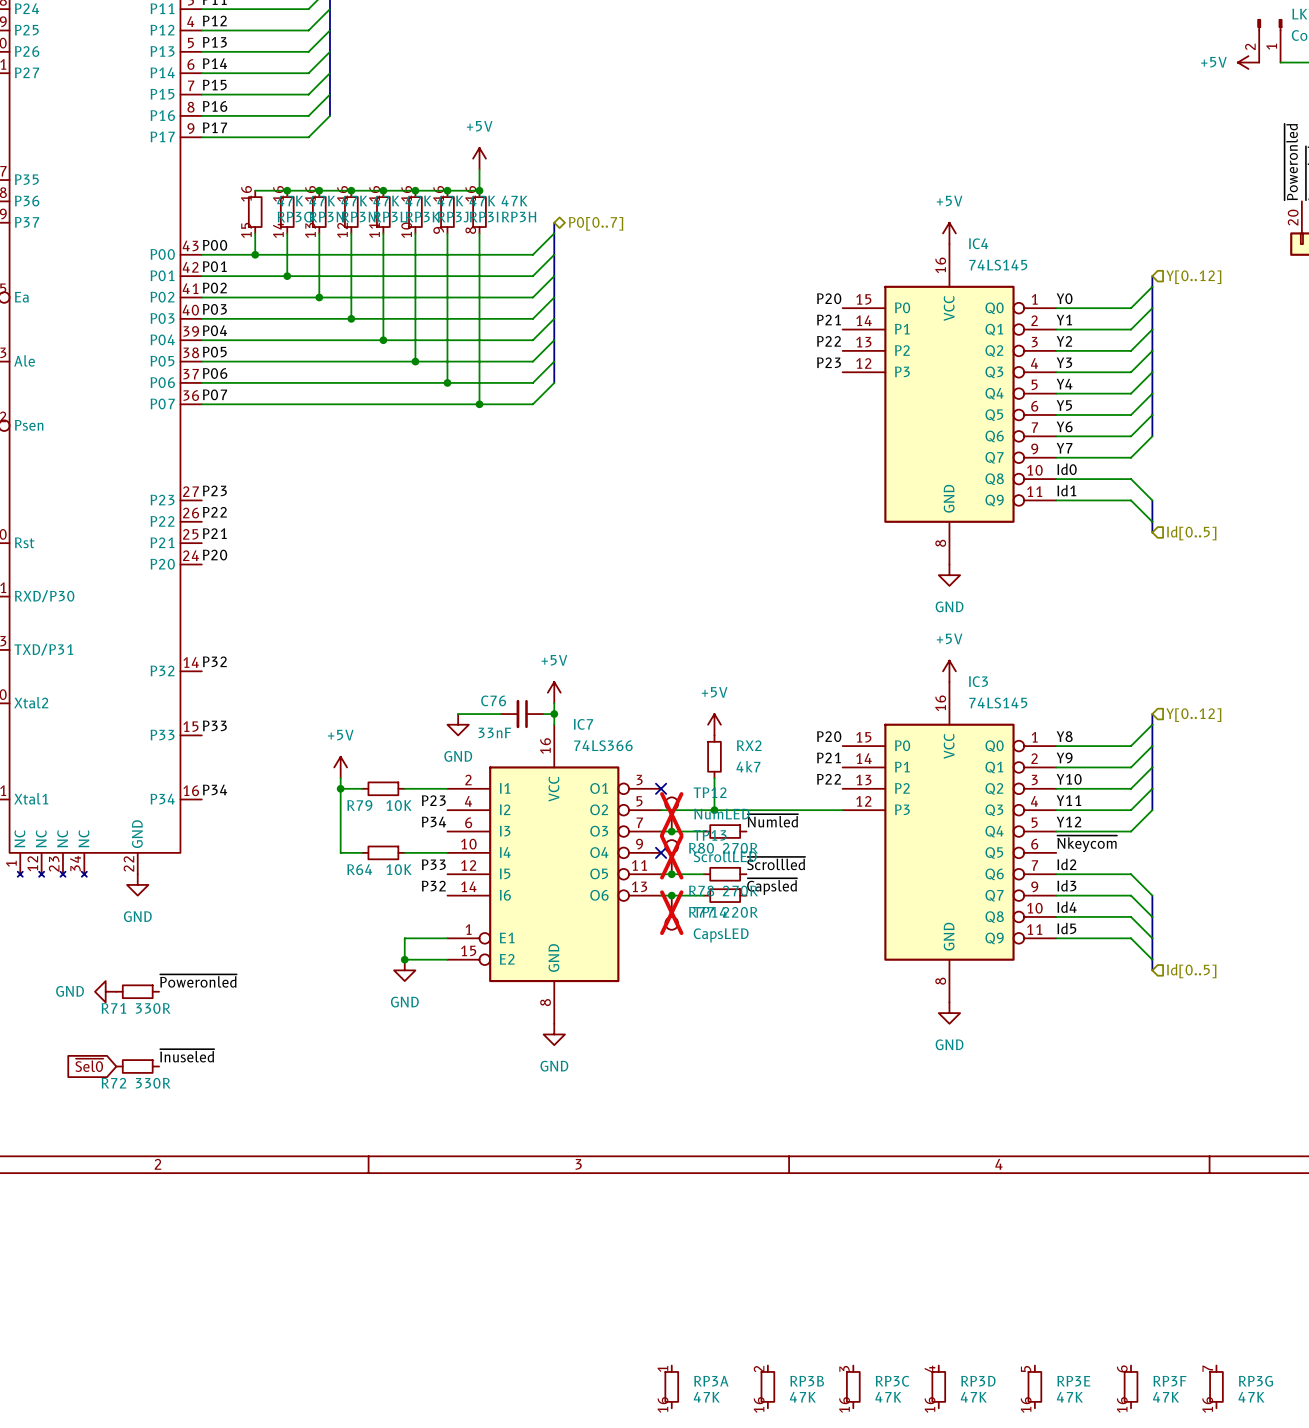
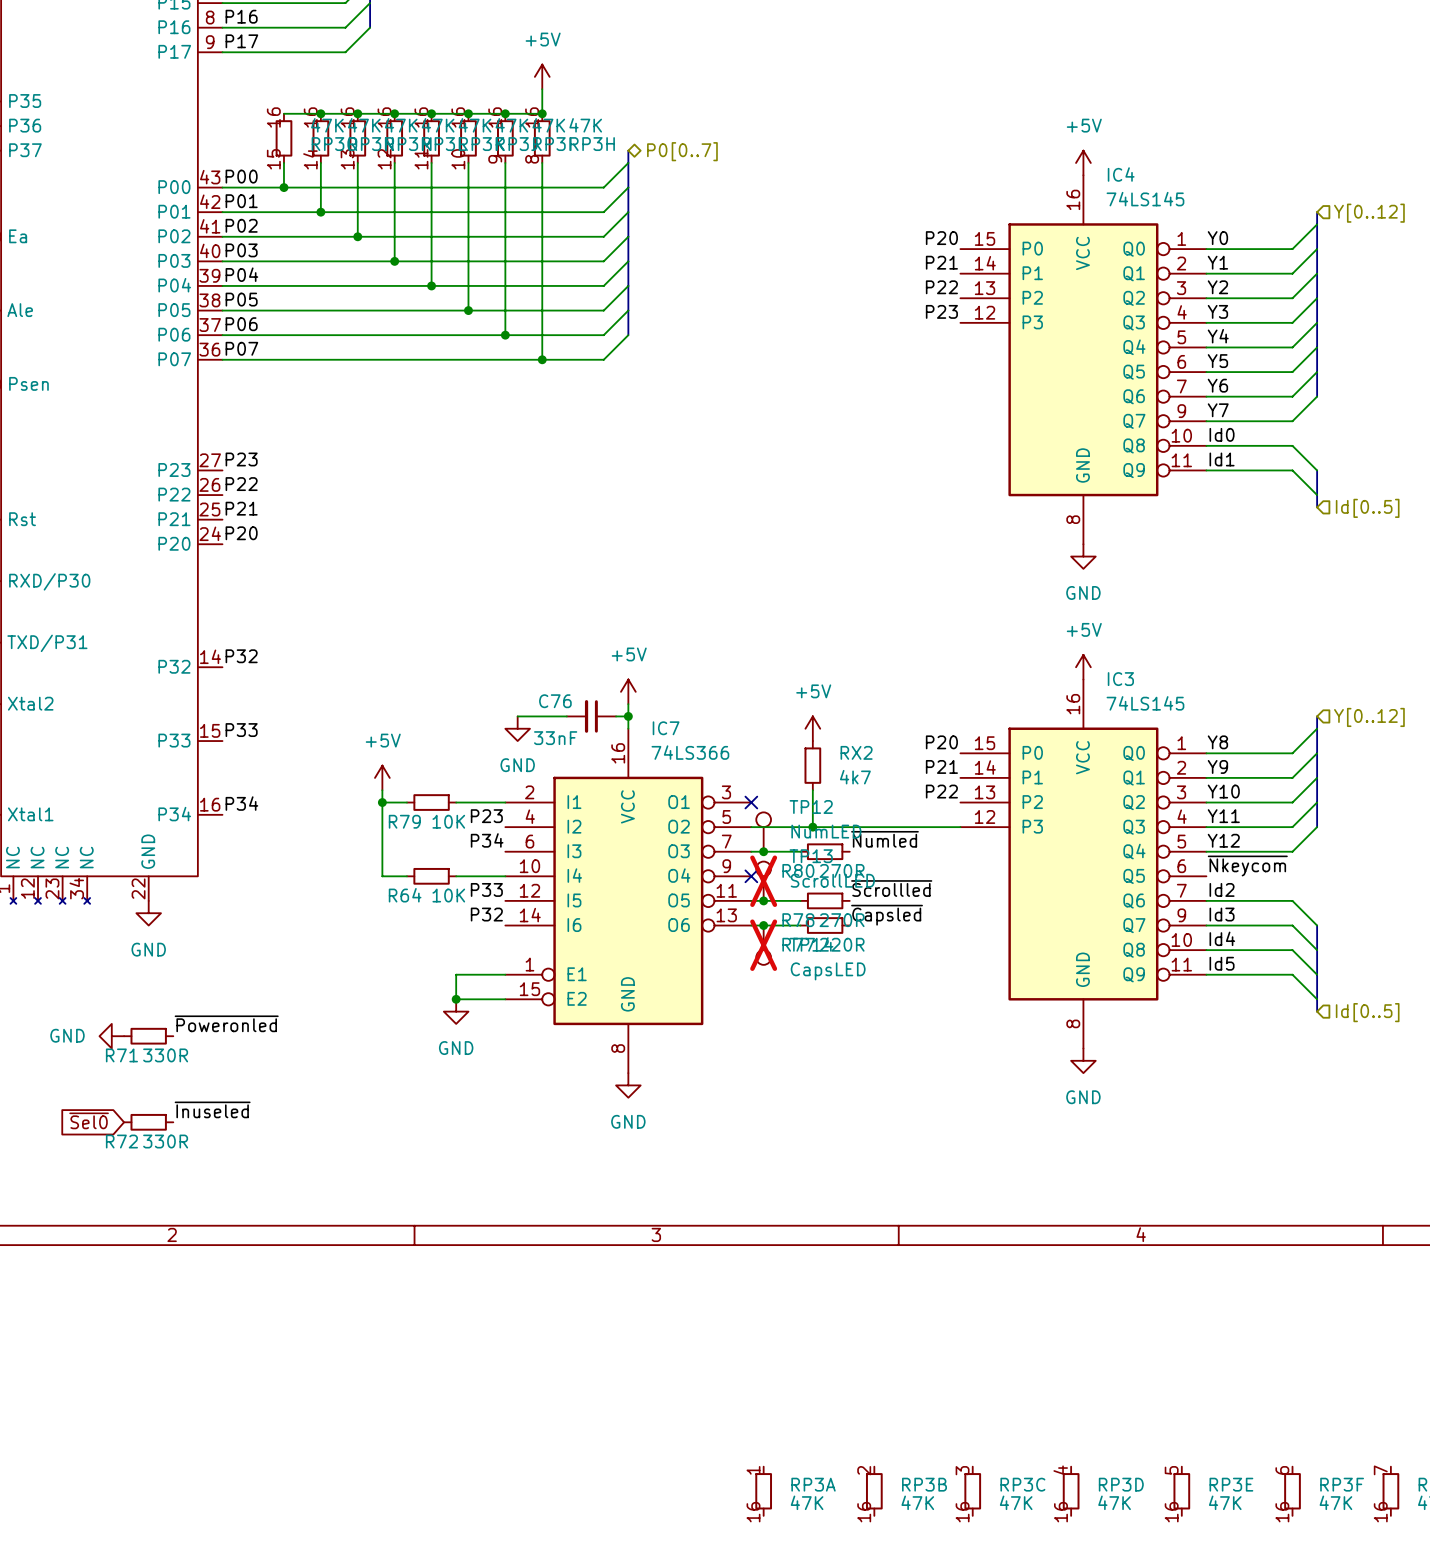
TP12 do-not-place cross: (671, 814) -> none

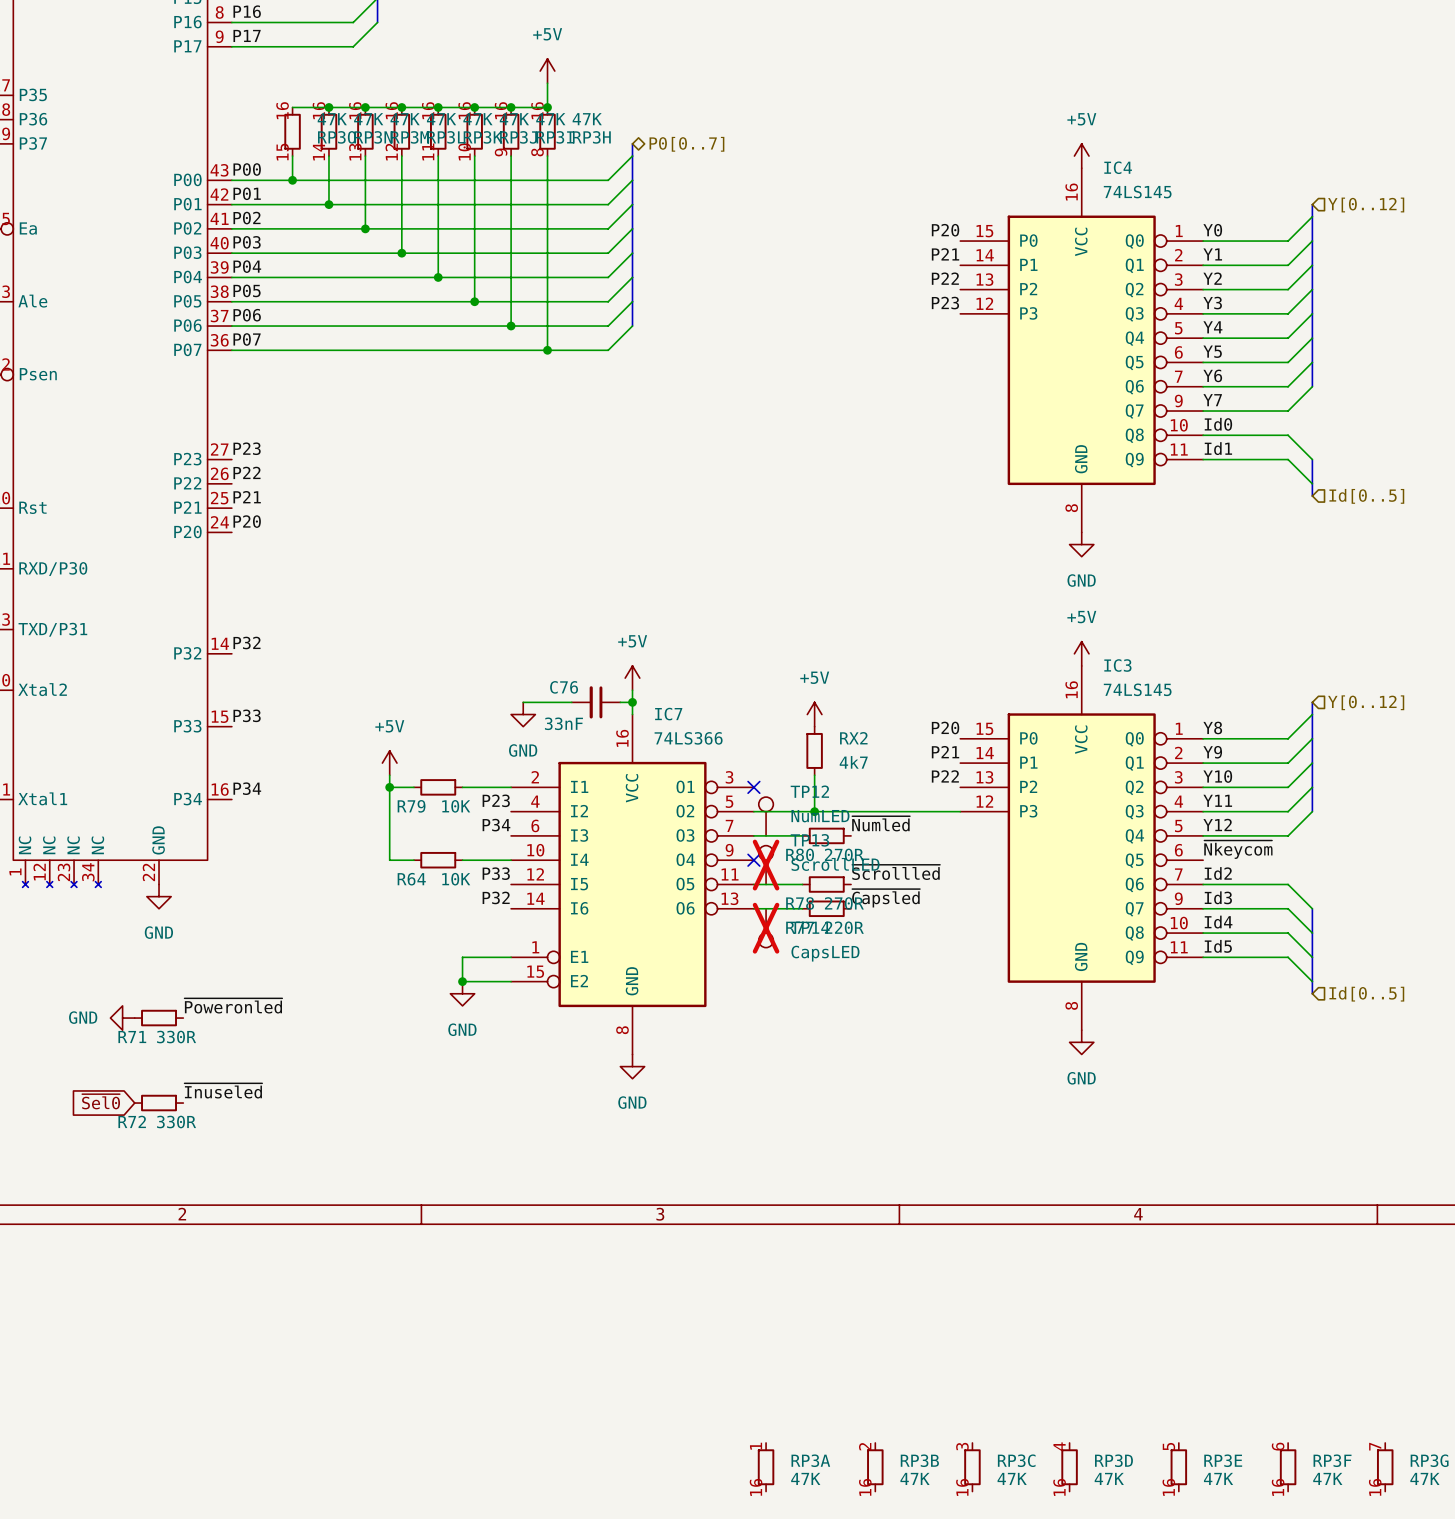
junction: (763, 851) -> none
junction: (763, 900) -> none
junction: (763, 925) -> none

